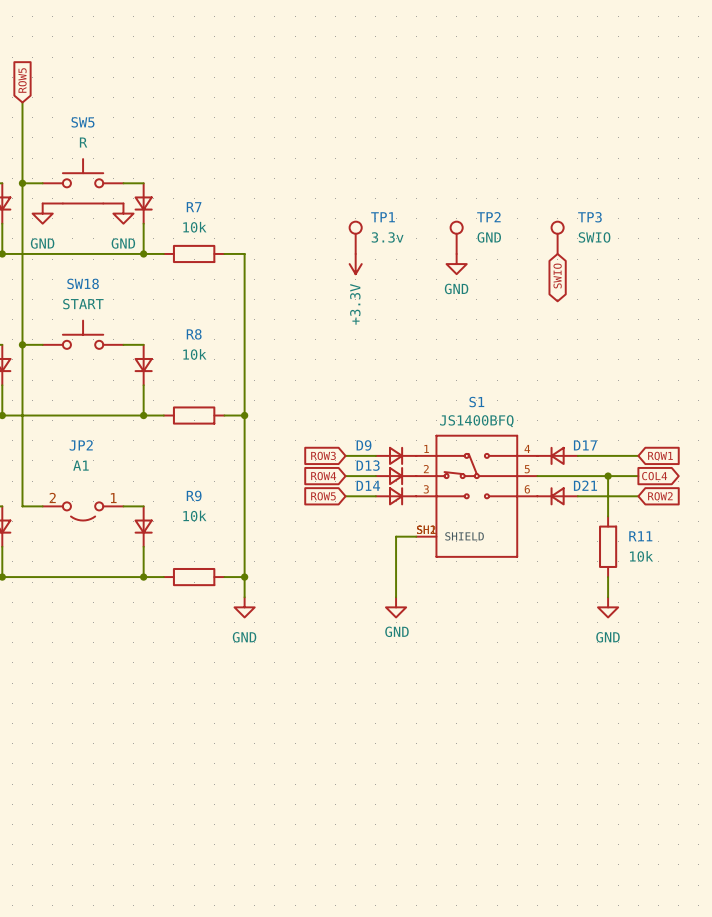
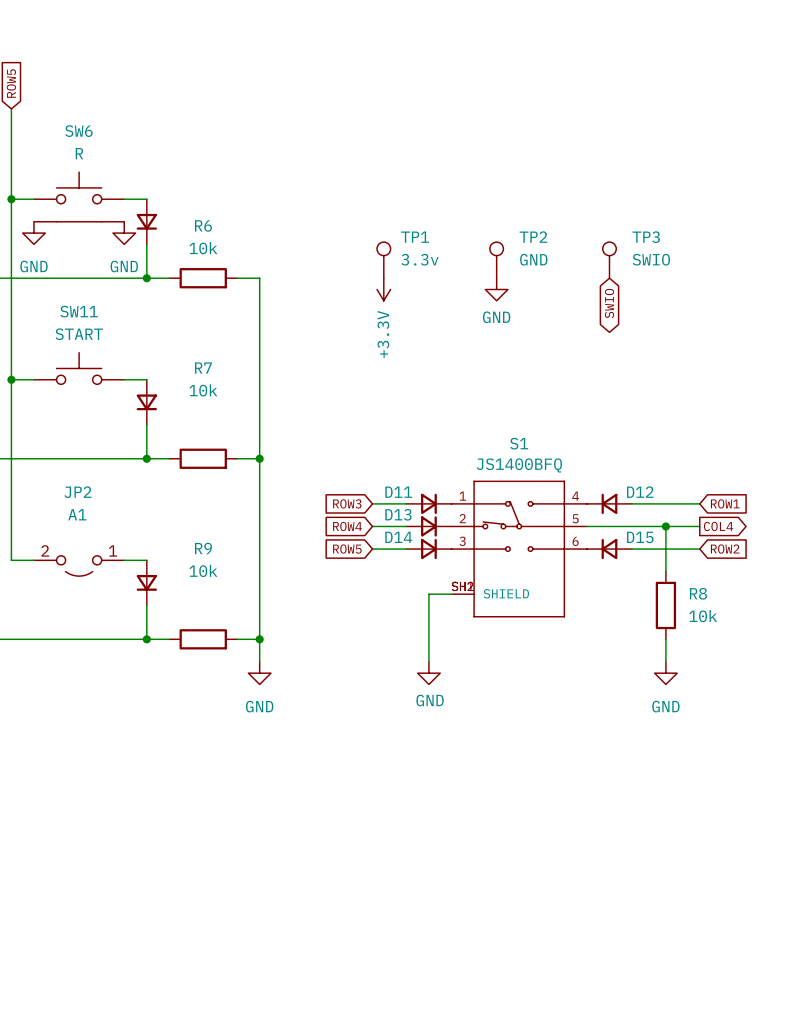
SW5 name: SW5 (82, 122) -> SW6 (78, 131)
R7 name: R7 (194, 207) -> R6 (203, 225)
SW18 name: SW18 (83, 283) -> SW11 (79, 311)
R8 name: R8 (194, 334) -> R7 (203, 368)
D9 name: D9 (364, 445) -> D11 (398, 492)
D17 name: D17 (585, 445) -> D12 (640, 492)
D21 name: D21 (585, 485) -> D15 (640, 537)
R11 name: R11 (640, 536) -> R8 (698, 593)

